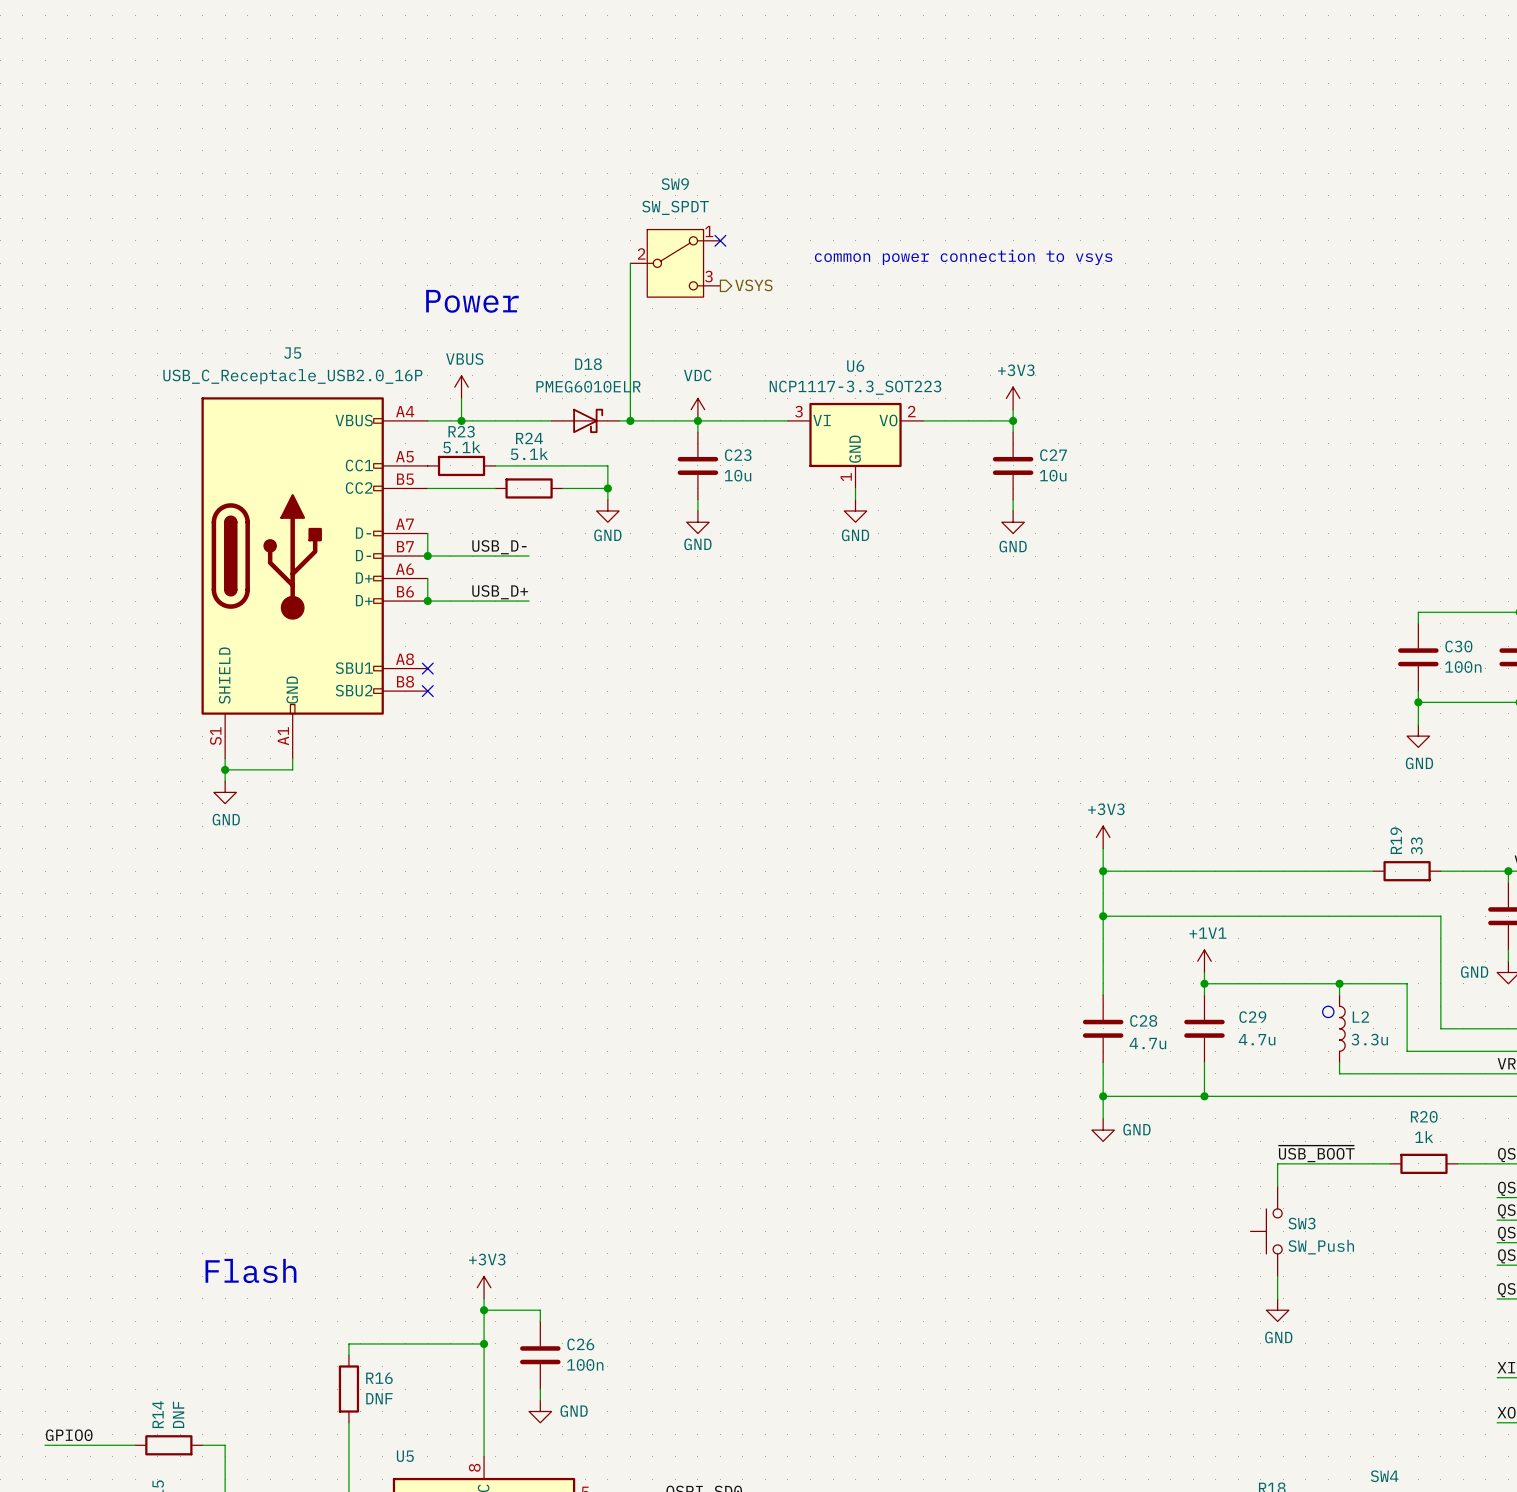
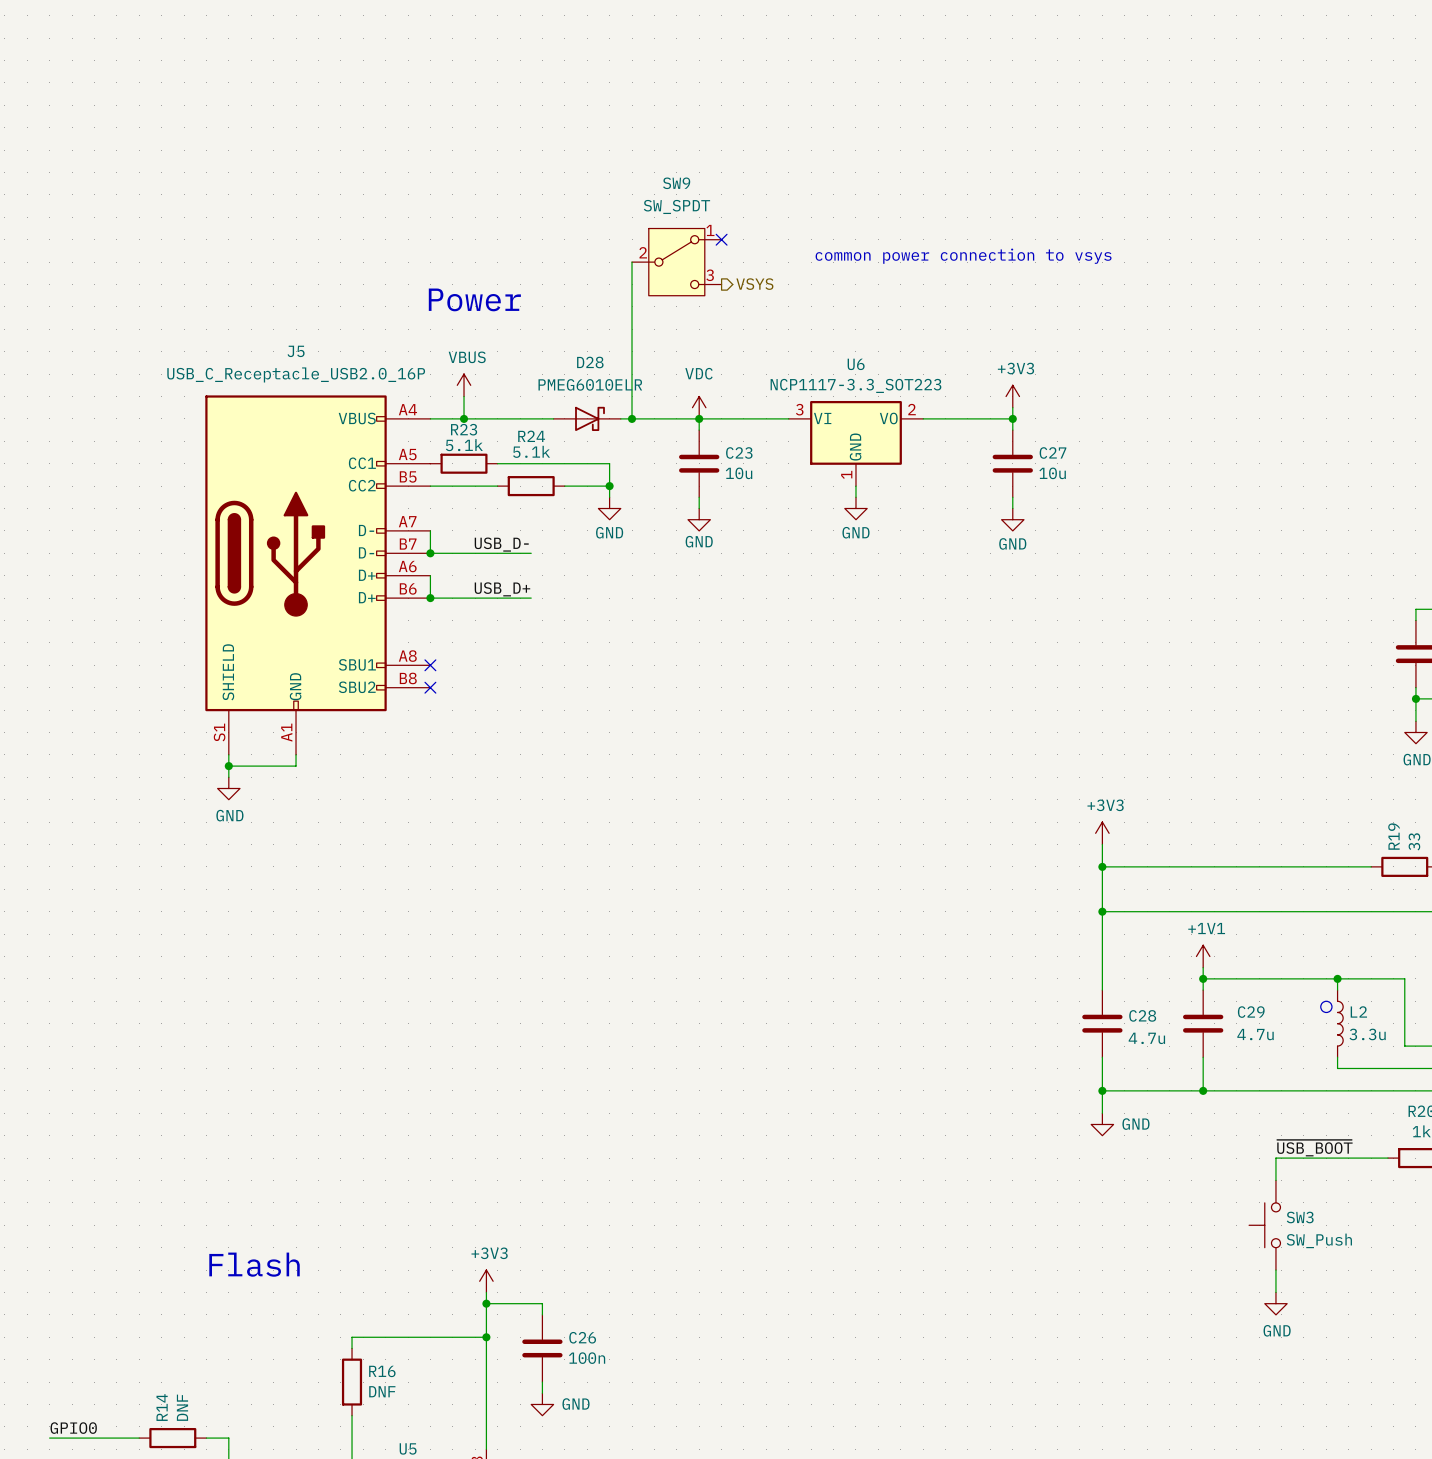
D18 name: D18 (588, 364) -> D28 (590, 362)

